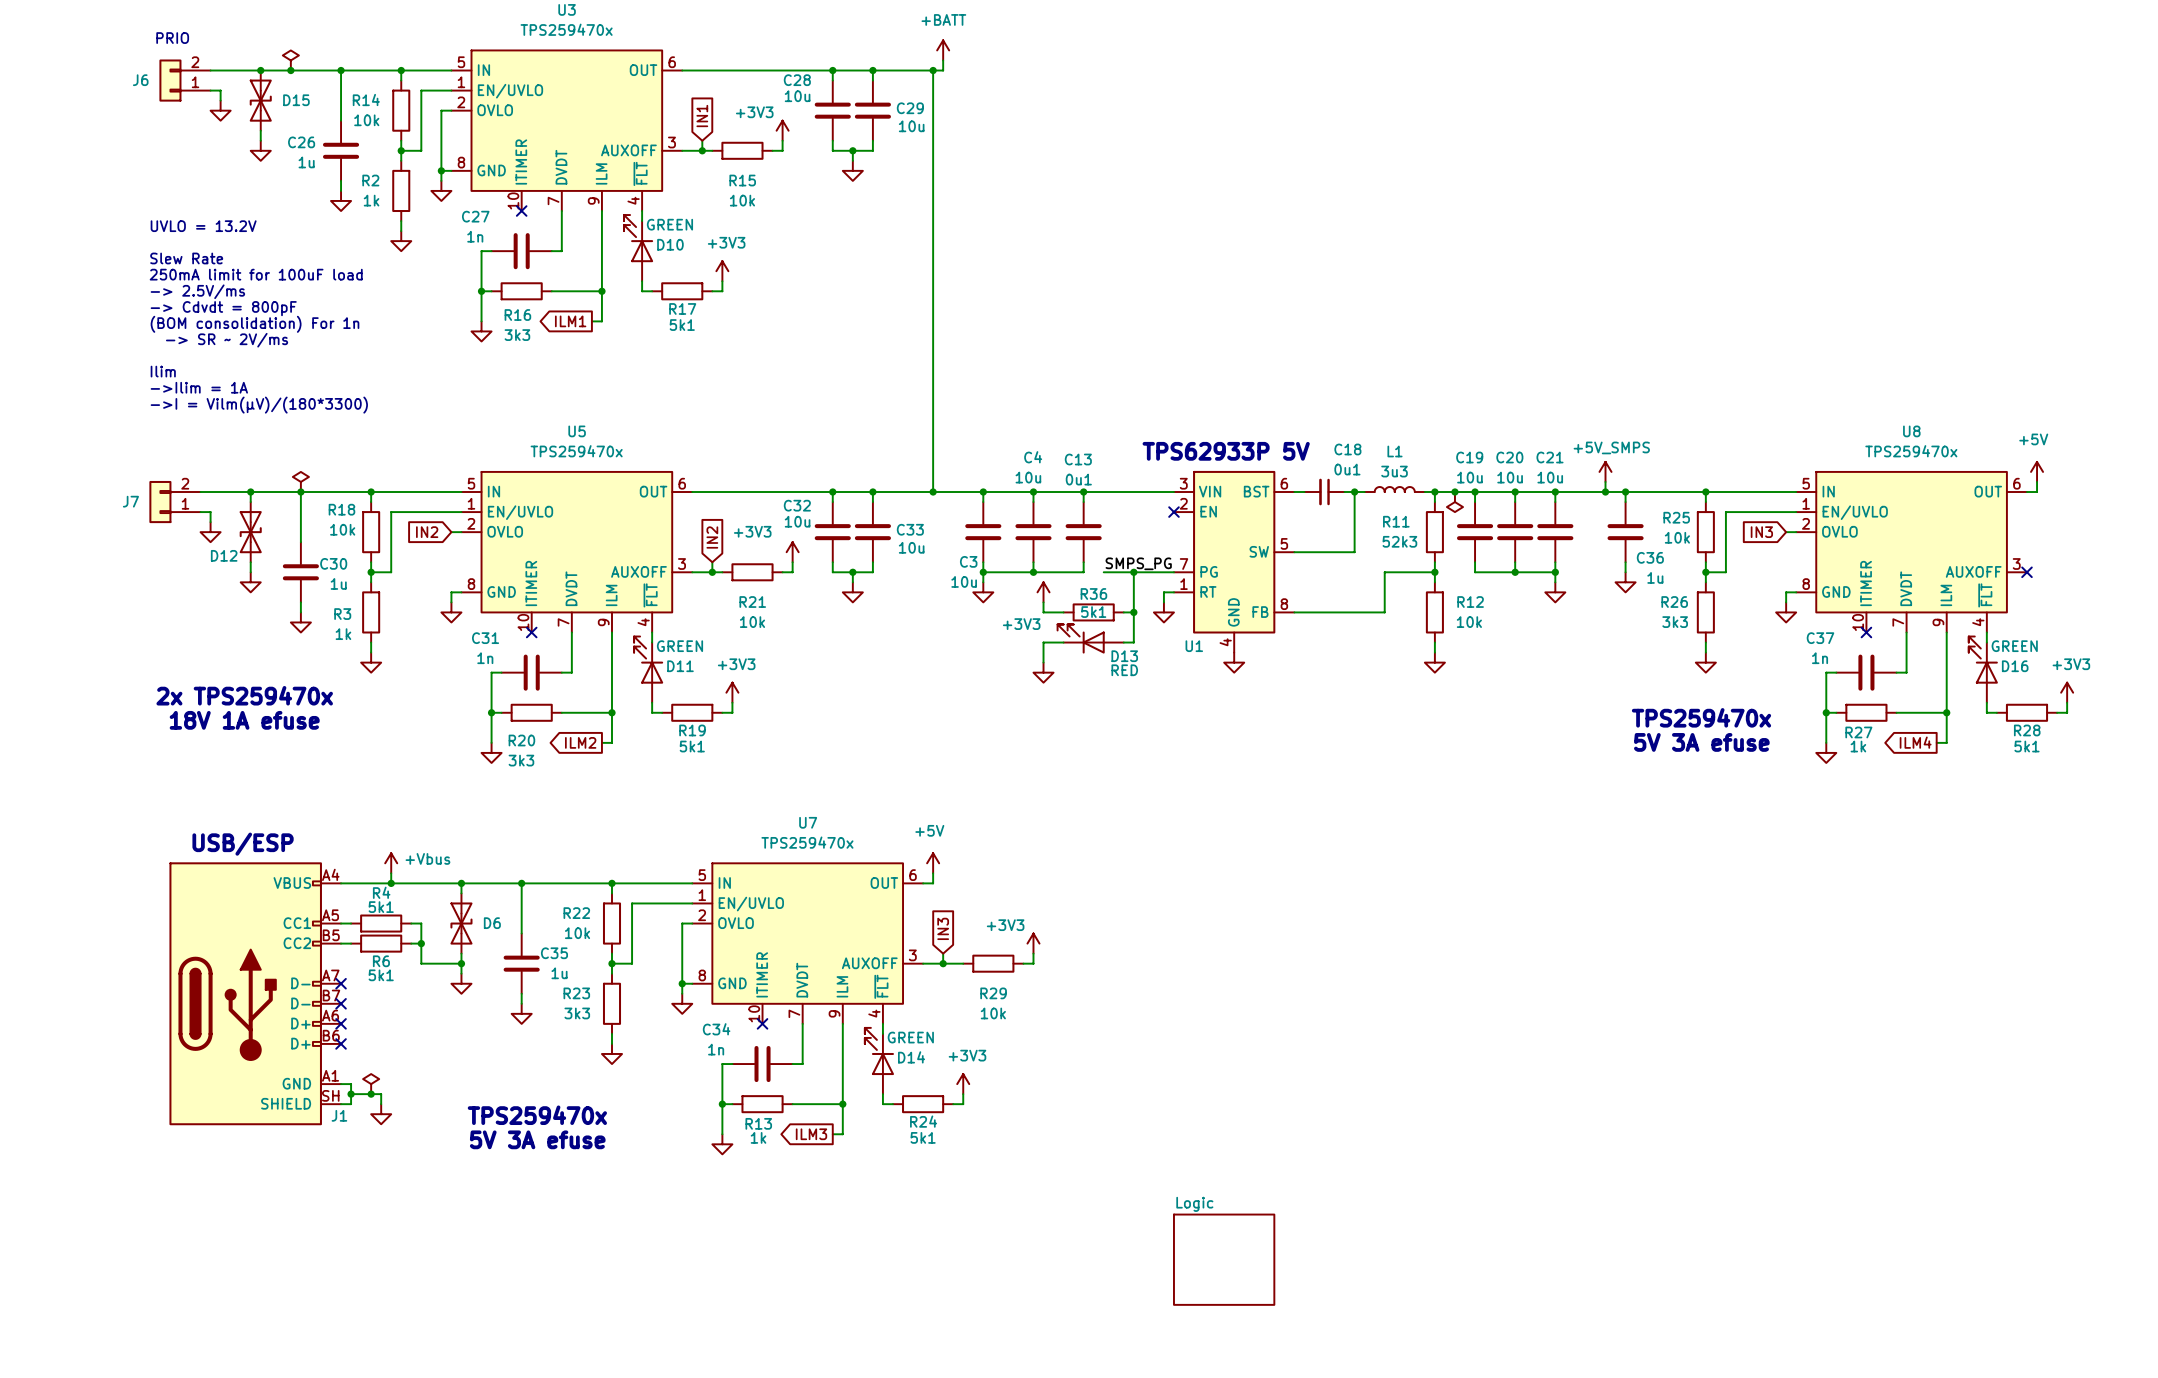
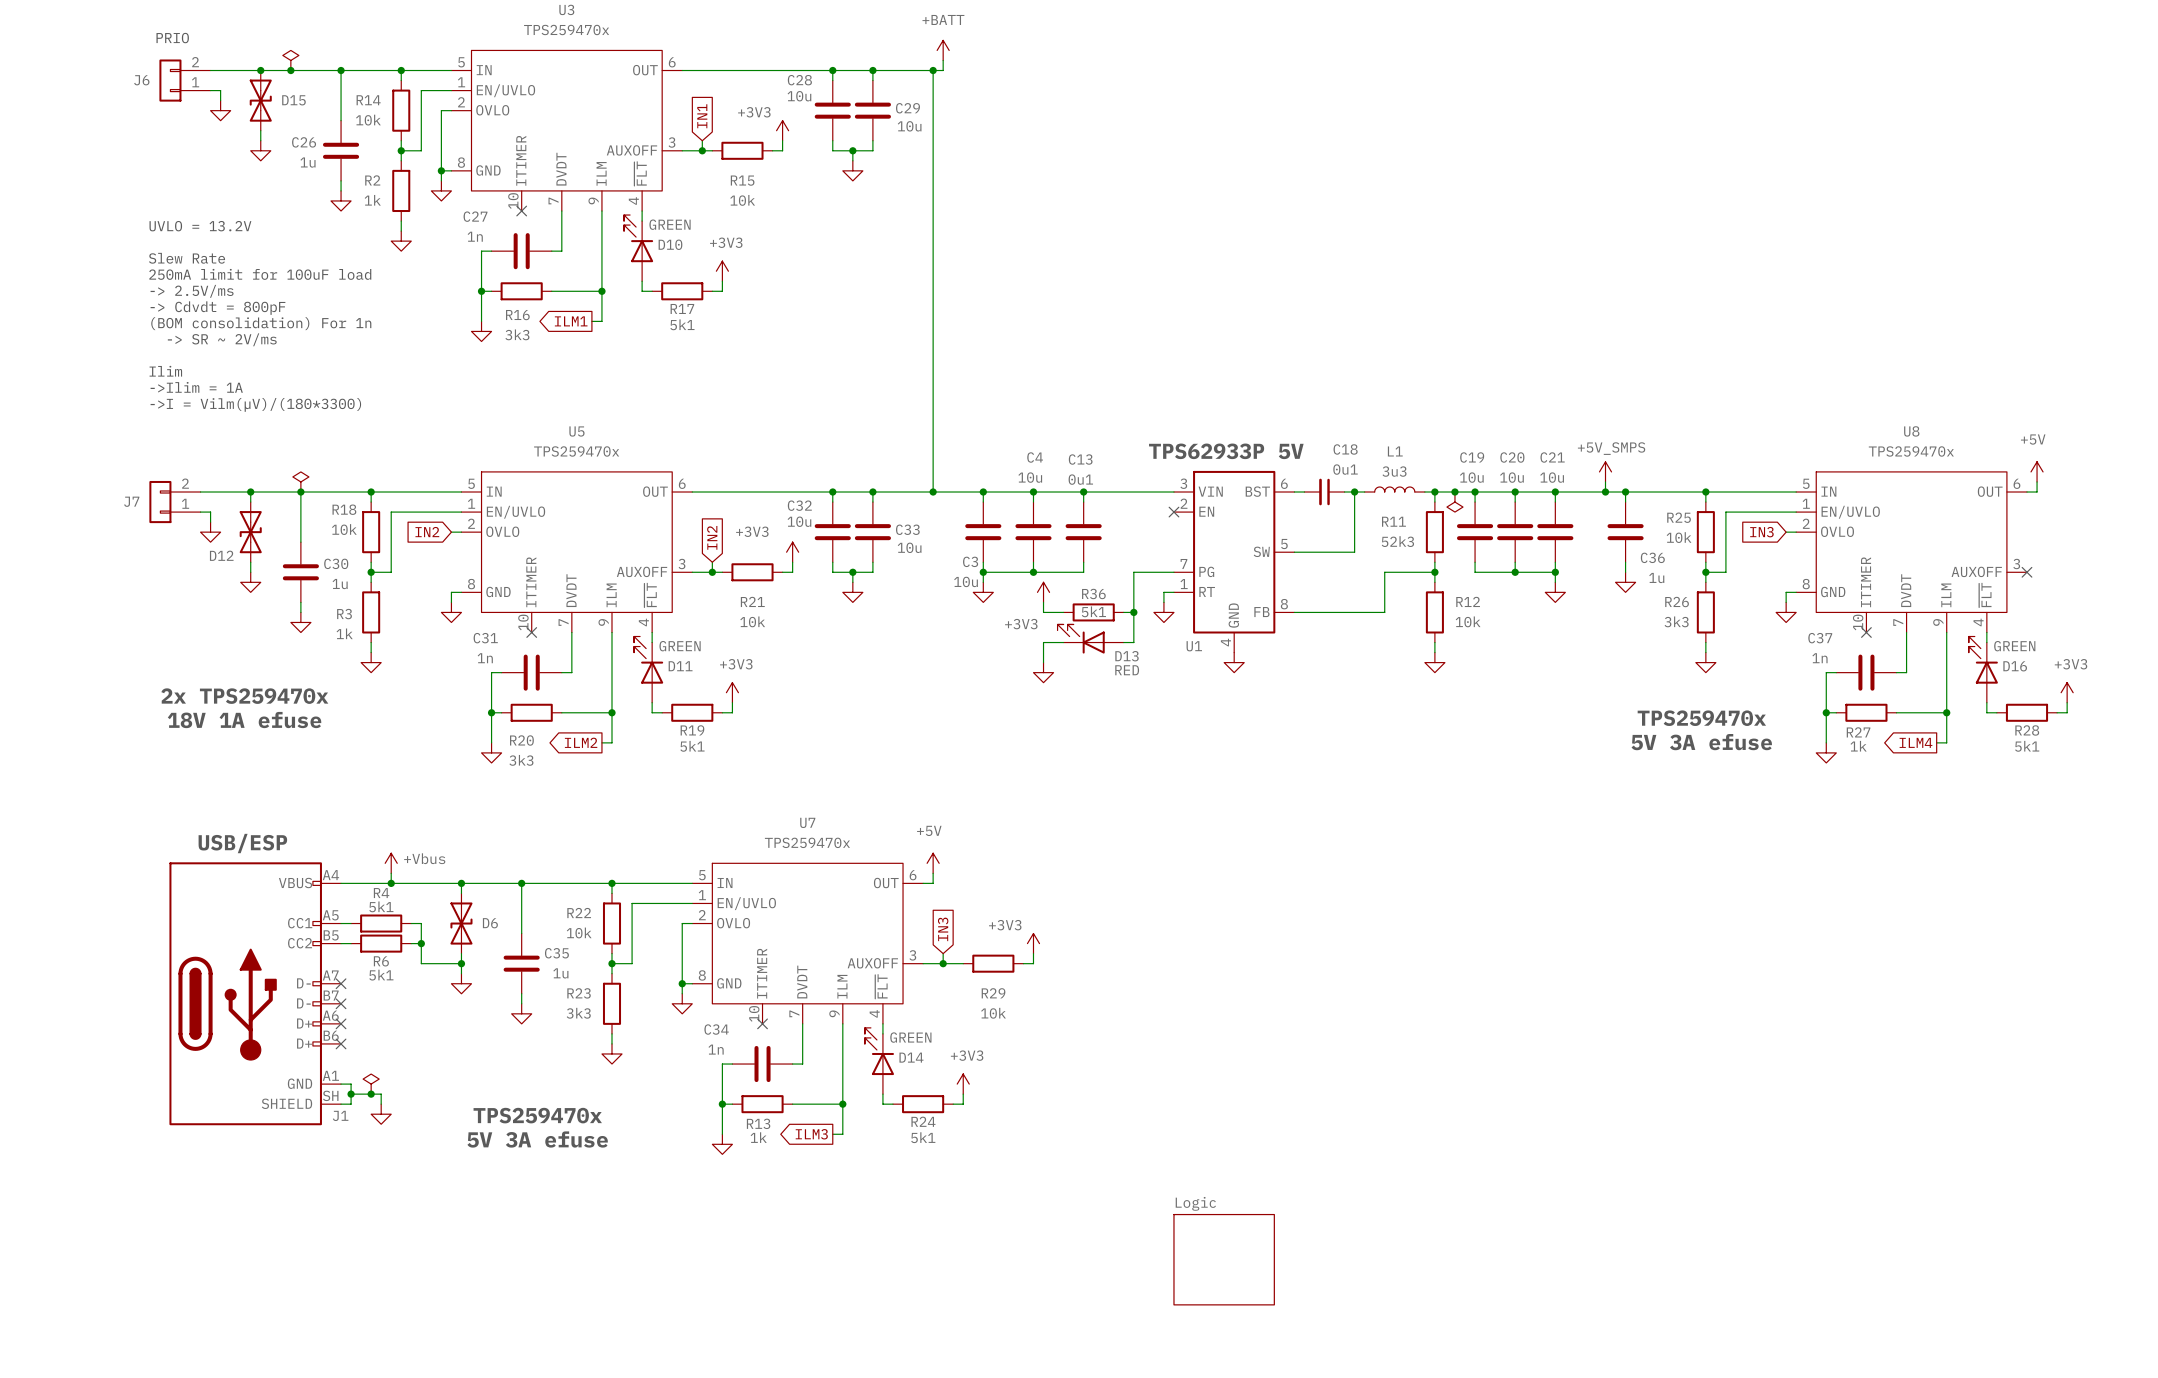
label: SMPS_PG (1138, 563) -> none
wire: (1103, 572) (1133, 572) -> none
junction: (1133, 572) -> none

